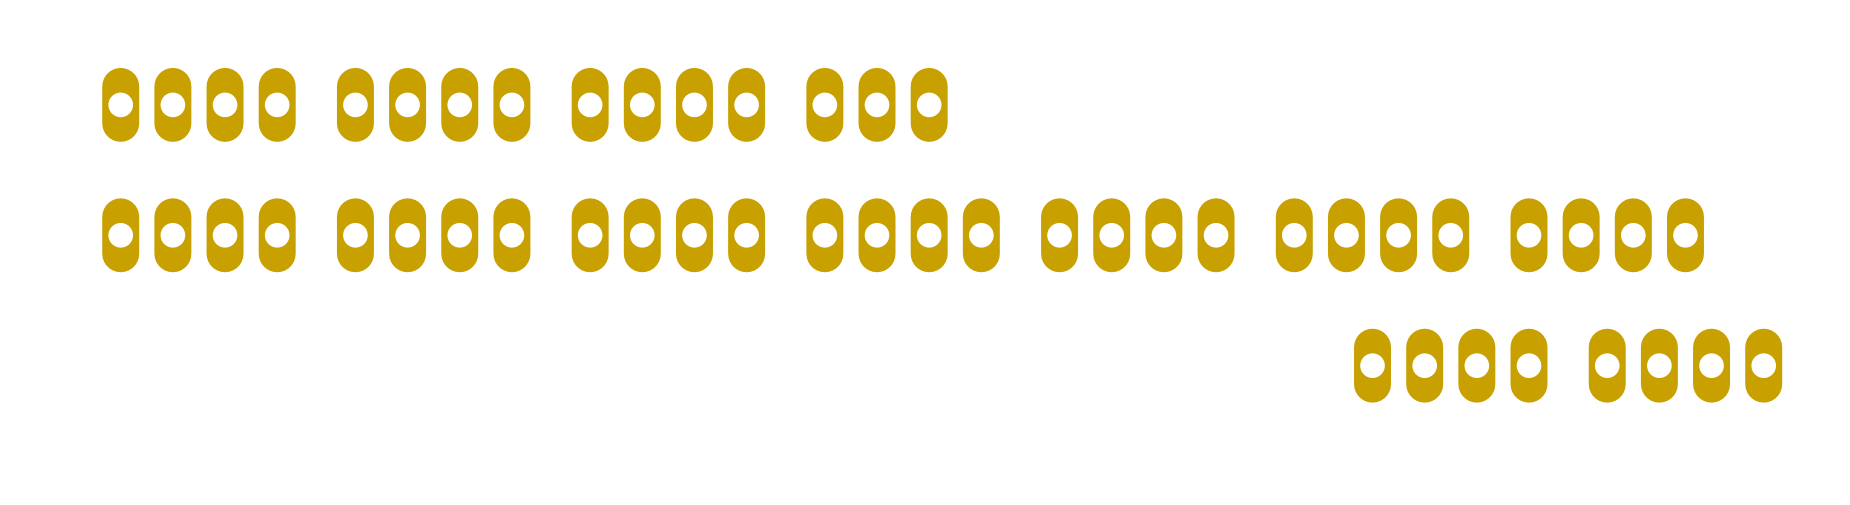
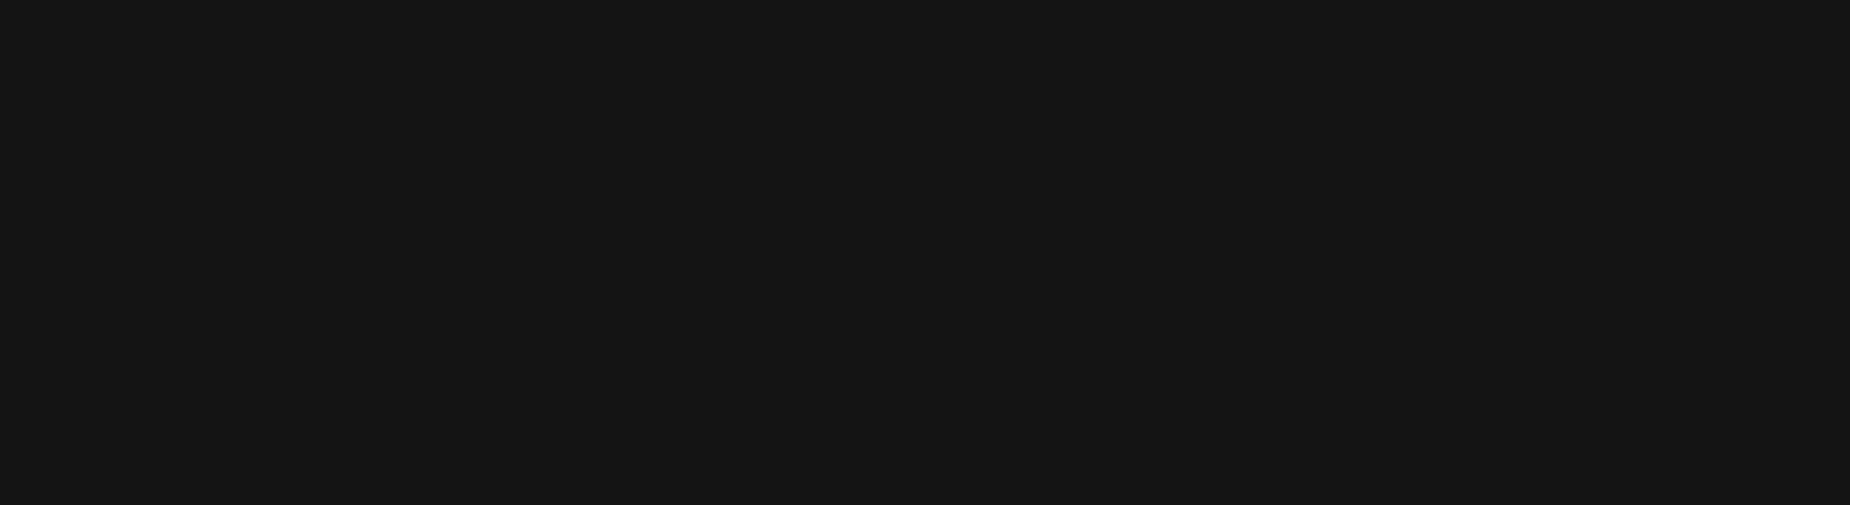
part: (198, 104) -> none
part: (433, 104) -> none
part: (668, 104) -> none
part: (877, 104) -> none
part: (198, 235) -> none
part: (433, 235) -> none
part: (668, 235) -> none
part: (903, 235) -> none
part: (1137, 235) -> none
part: (1372, 235) -> none
part: (1607, 235) -> none
part: (1450, 365) -> none
part: (1685, 365) -> none

